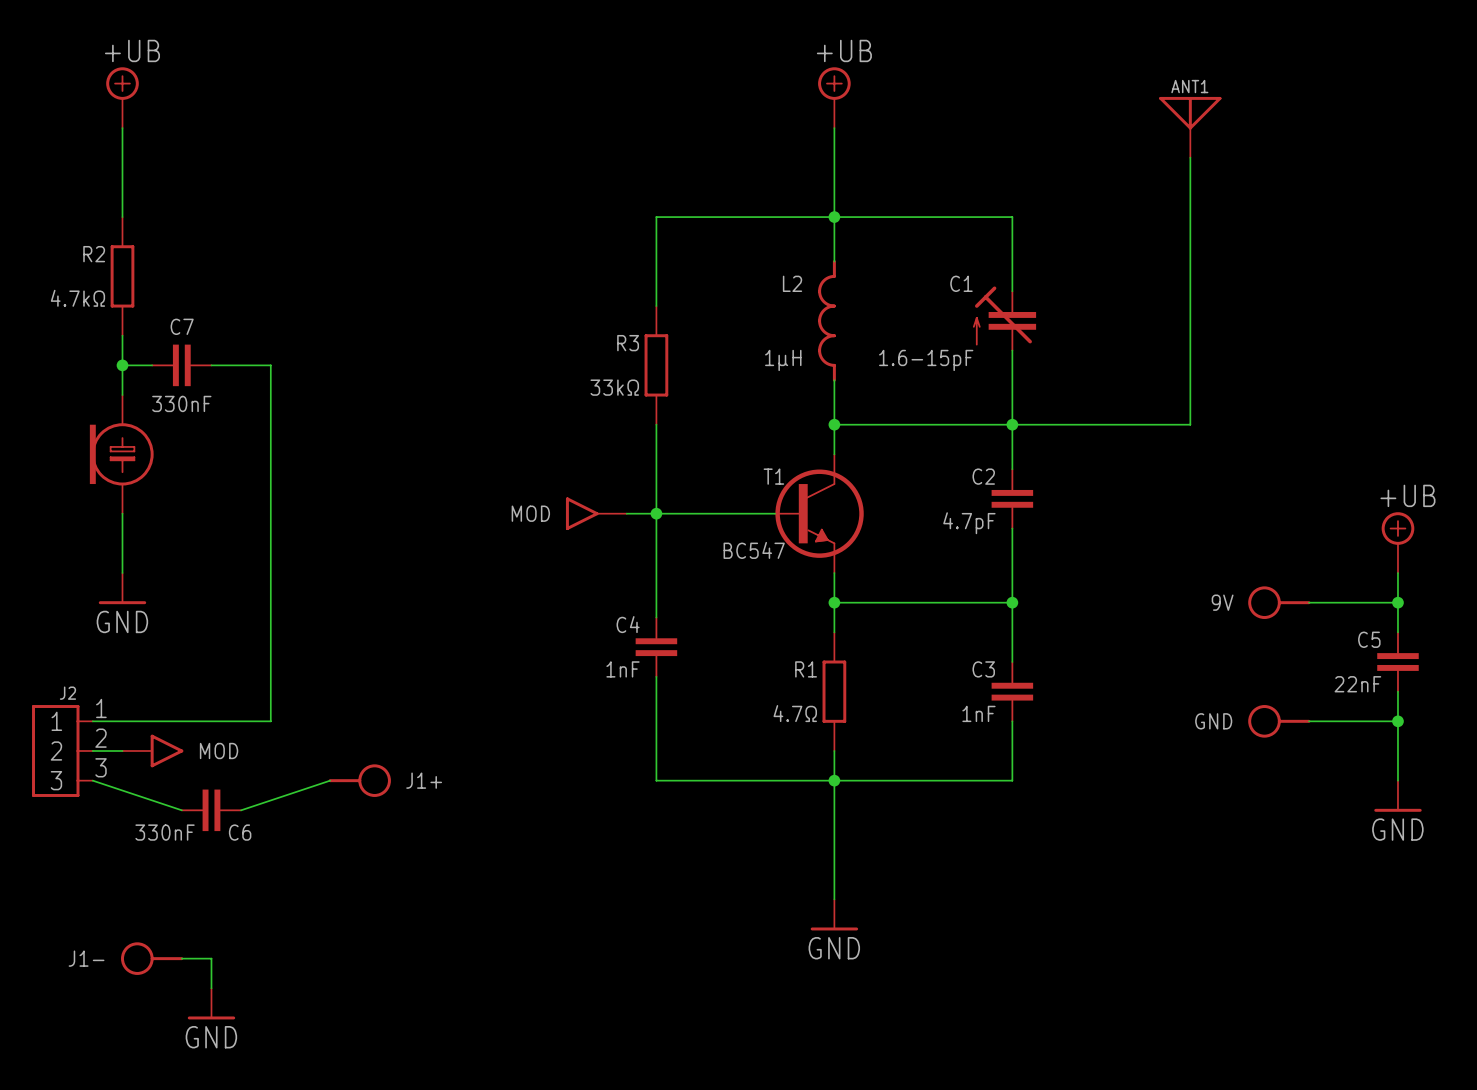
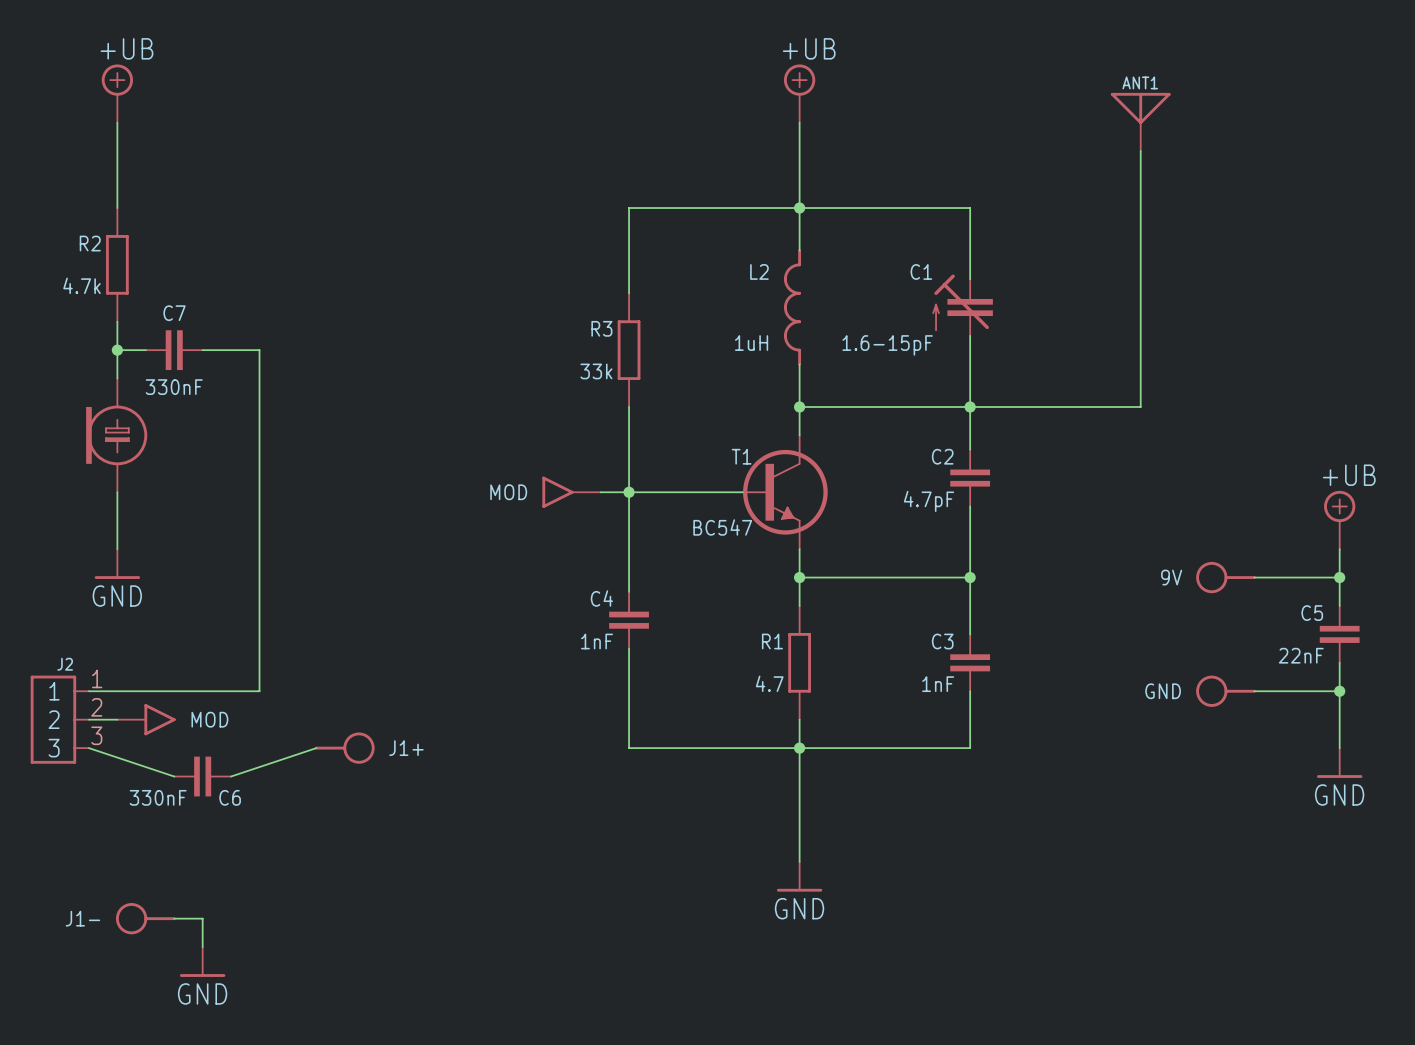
R2 value: 4.7kΩ (77, 298) -> 4.7k (82, 285)
L2 value: 1μH (783, 360) -> 1uH (751, 343)
R3 value: 33kΩ (614, 387) -> 33k (596, 371)
R1 value: 4.7Ω (795, 713) -> 4.7 (769, 683)

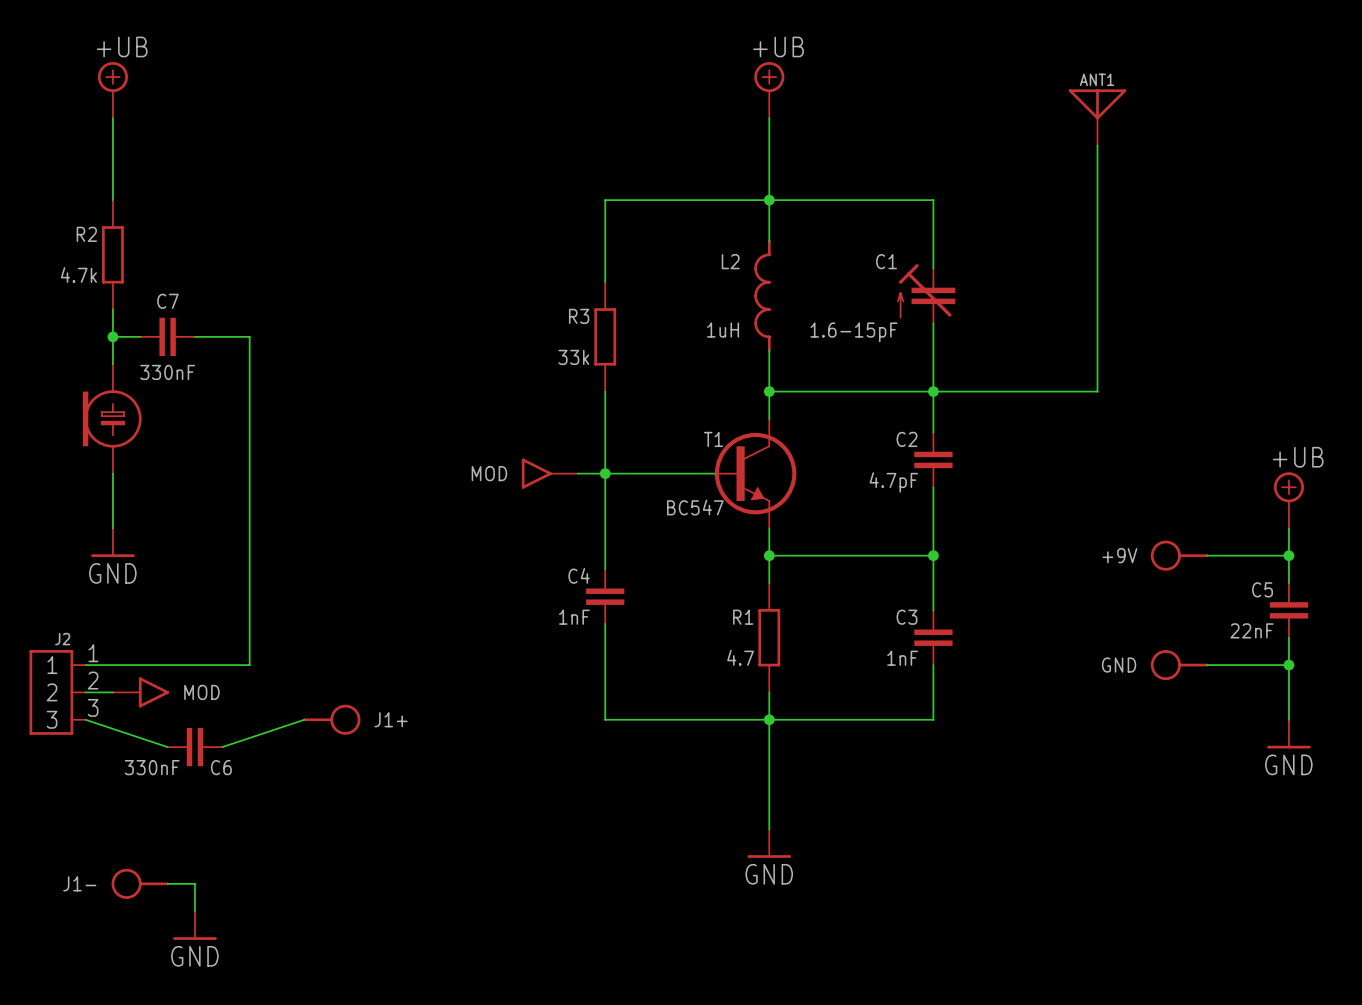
9V name: 9V (1171, 577) -> +9V (1119, 555)

